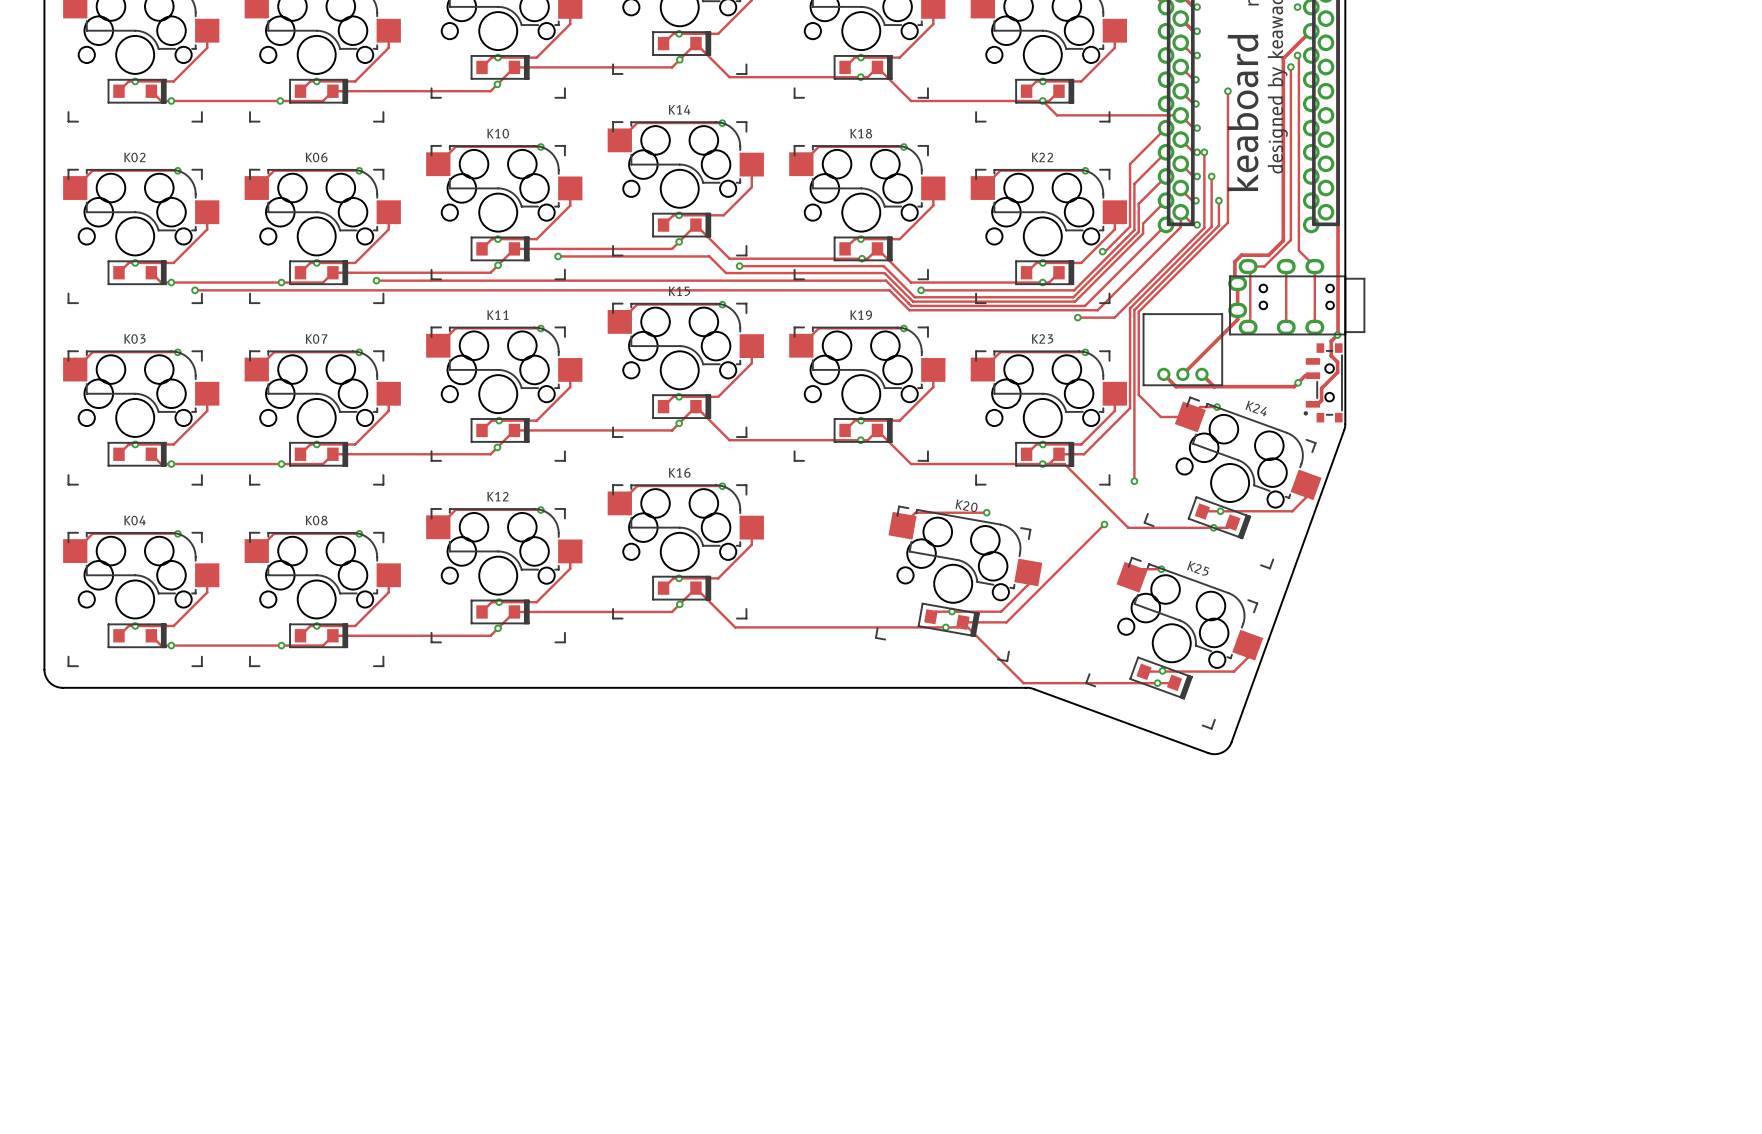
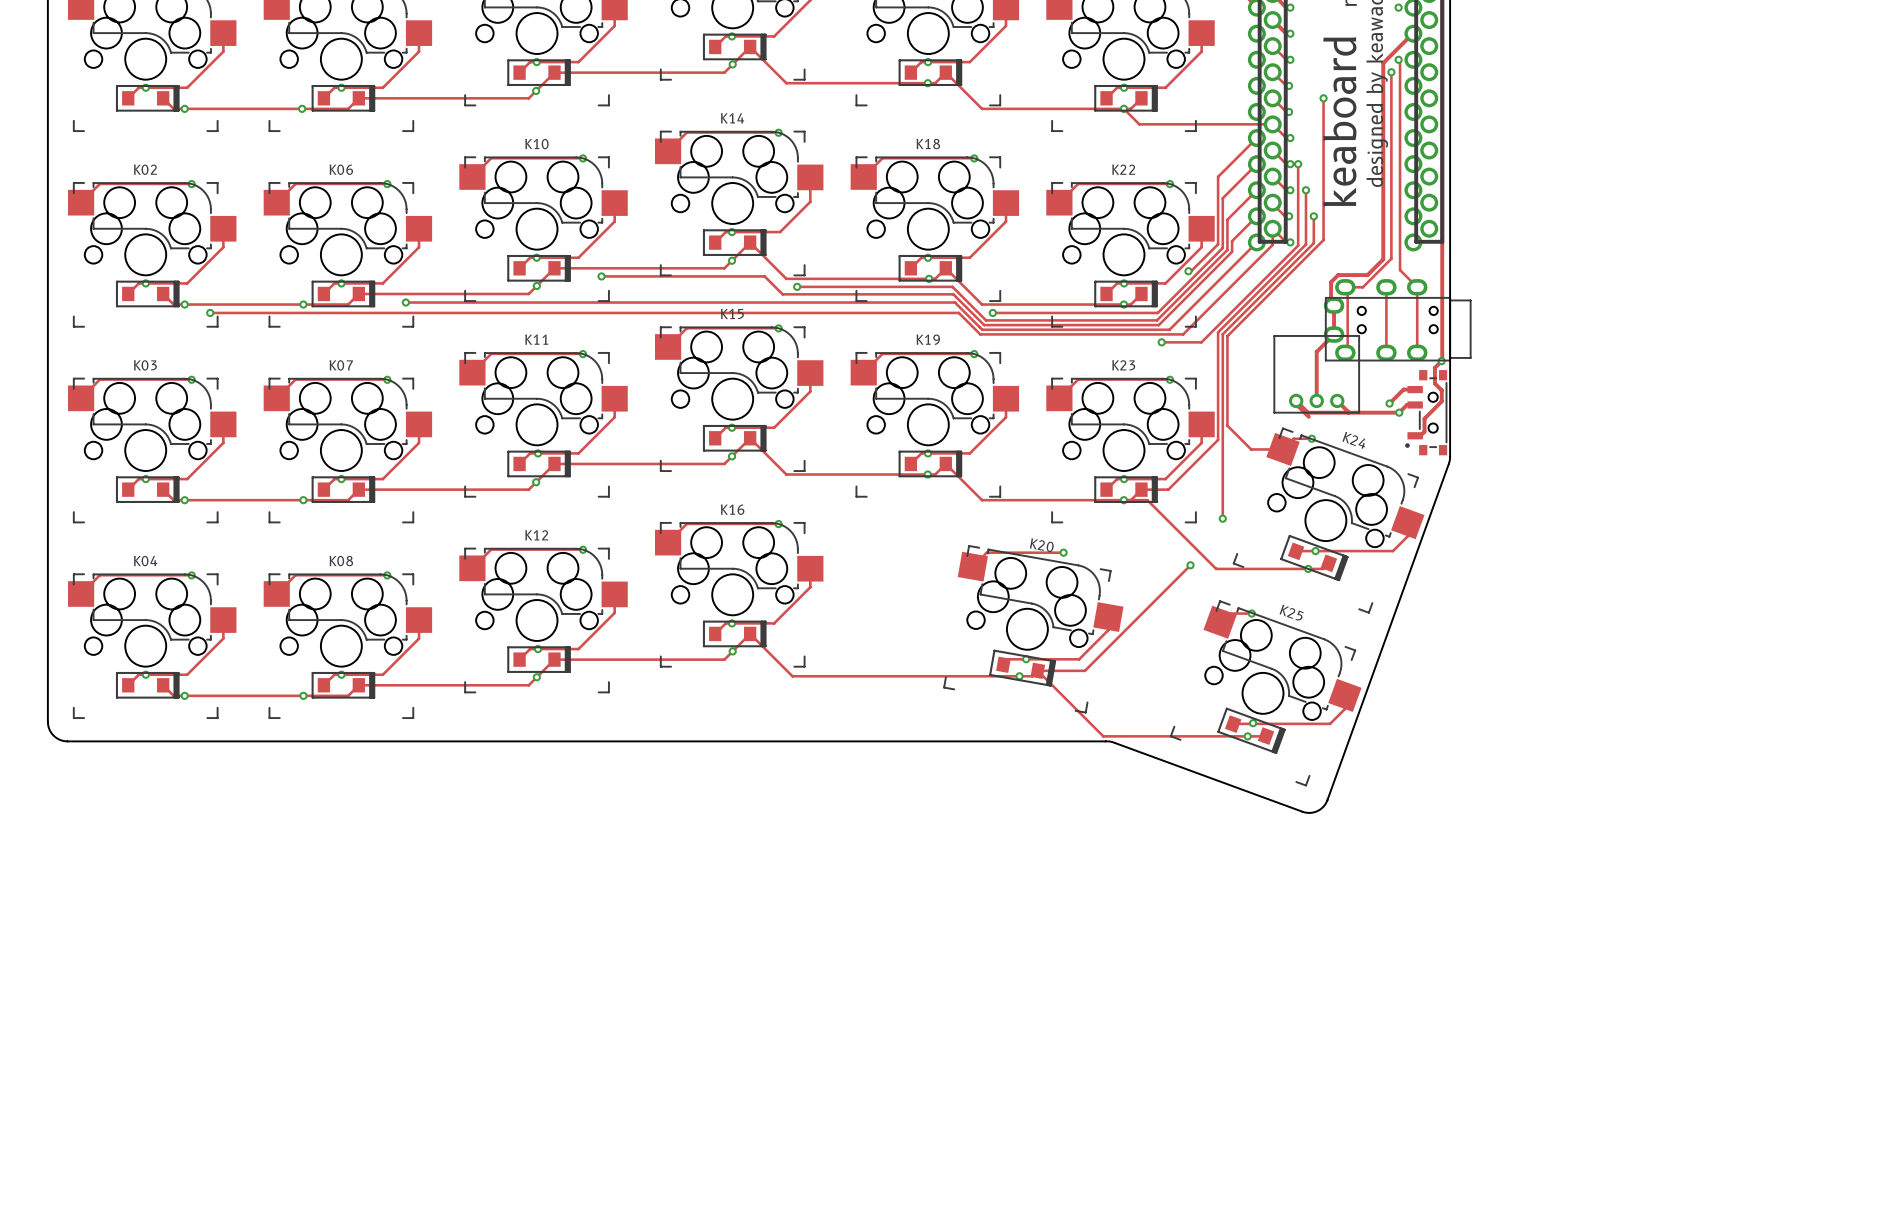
track: (1237, 310) (1237, 319) (1182, 374) -> (1334, 334) (1316, 351) (1316, 400)
part position: (1182, 349) -> (1316, 374)
track: none -> (1415, 389) (1403, 389) (1389, 403)
track: none -> (1337, 400) (1348, 412)
track: (1163, 374) (1176, 386) (1294, 386) (1298, 382) -> (1296, 400) (1307, 412) (1399, 412)
via: none -> (1389, 403)

